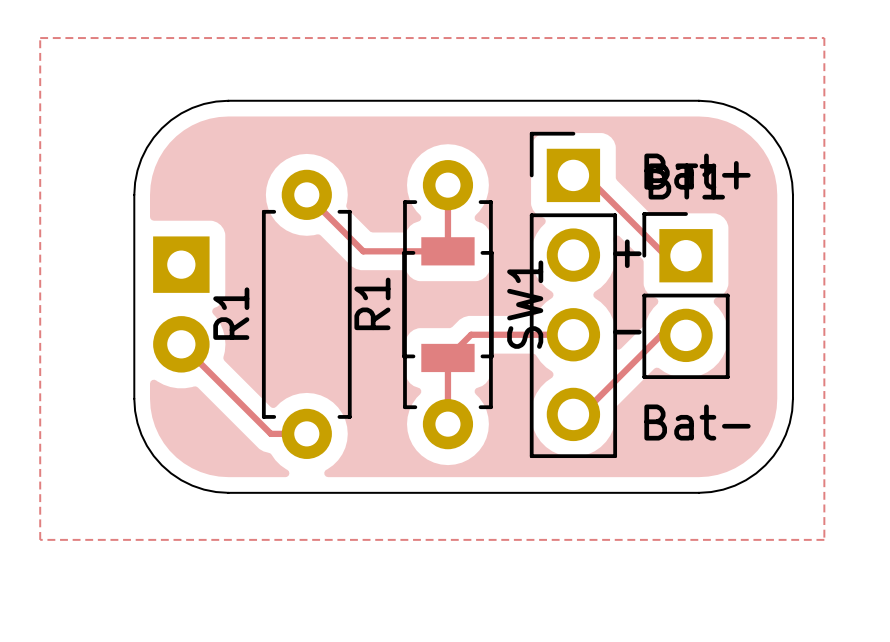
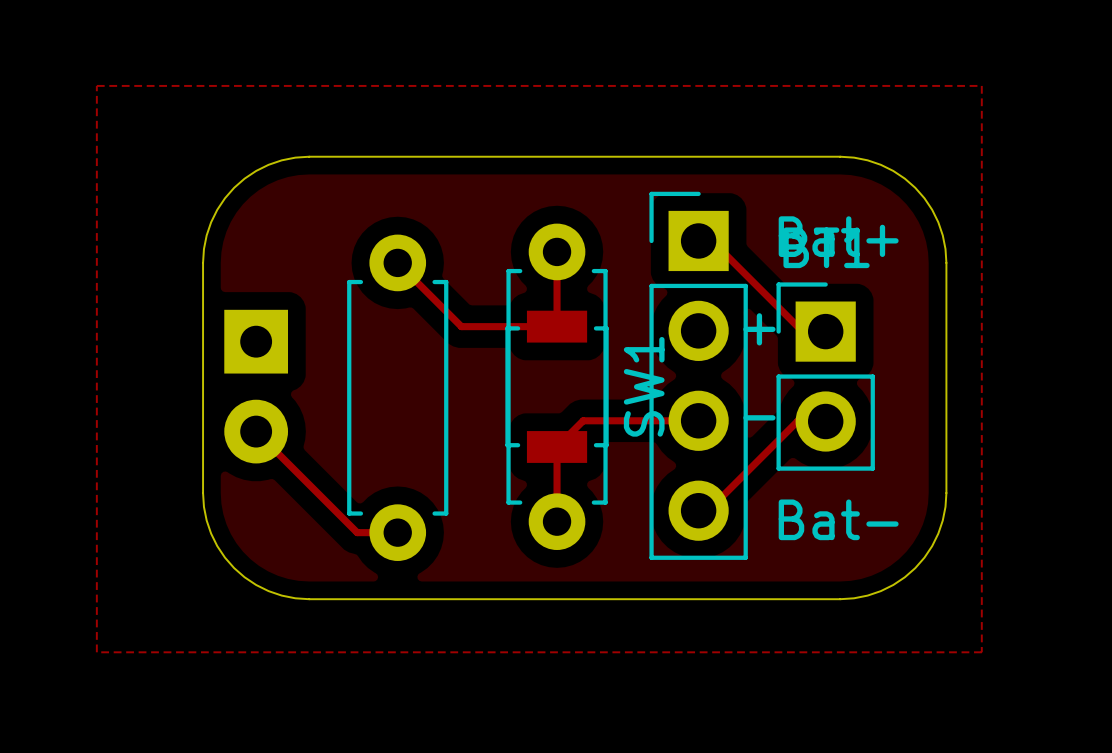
R1 name: R1 (372, 303) -> none
R1 name: R1 (231, 313) -> none

